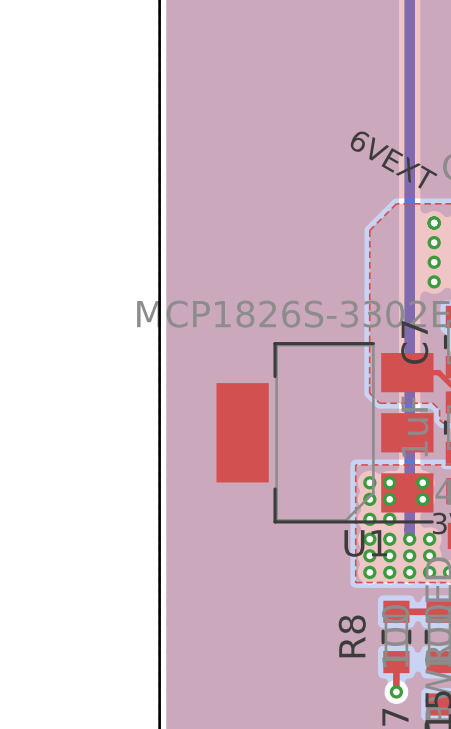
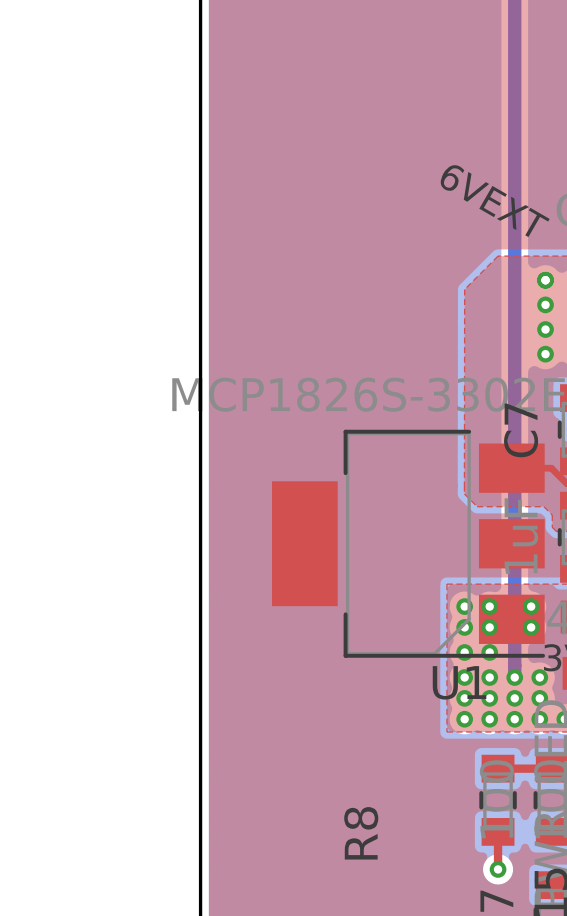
R8 name position: R8 (352, 636) -> R8 (361, 833)

